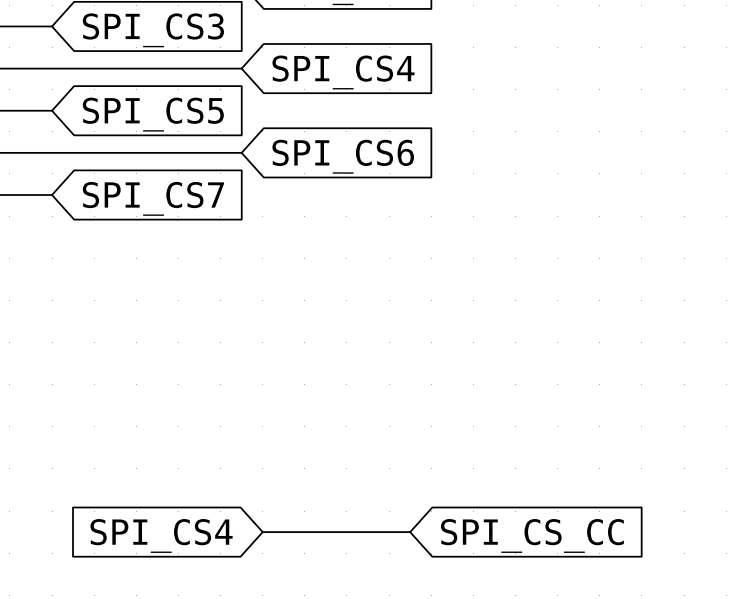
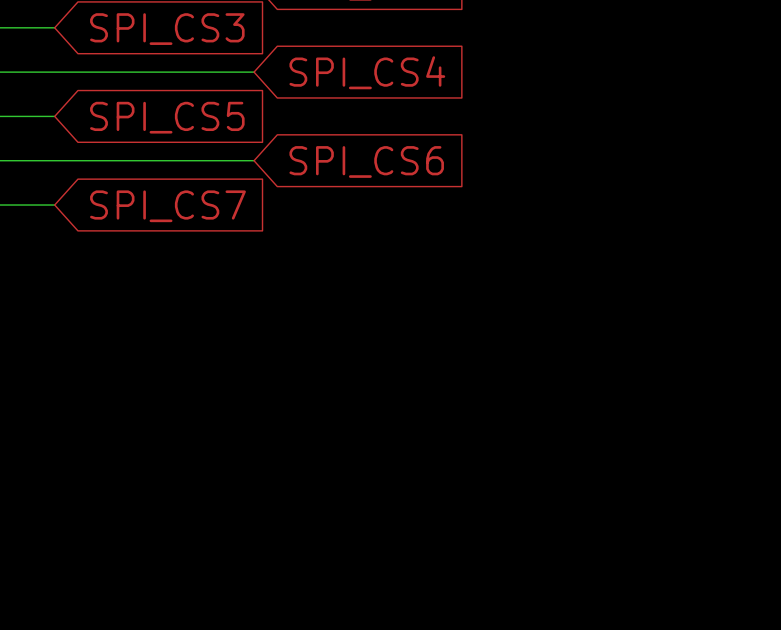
wire: (262, 532) (410, 532) -> none
global label: SPI_CS4 (161, 535) -> none
global label: SPI_CS_CC (532, 535) -> none

